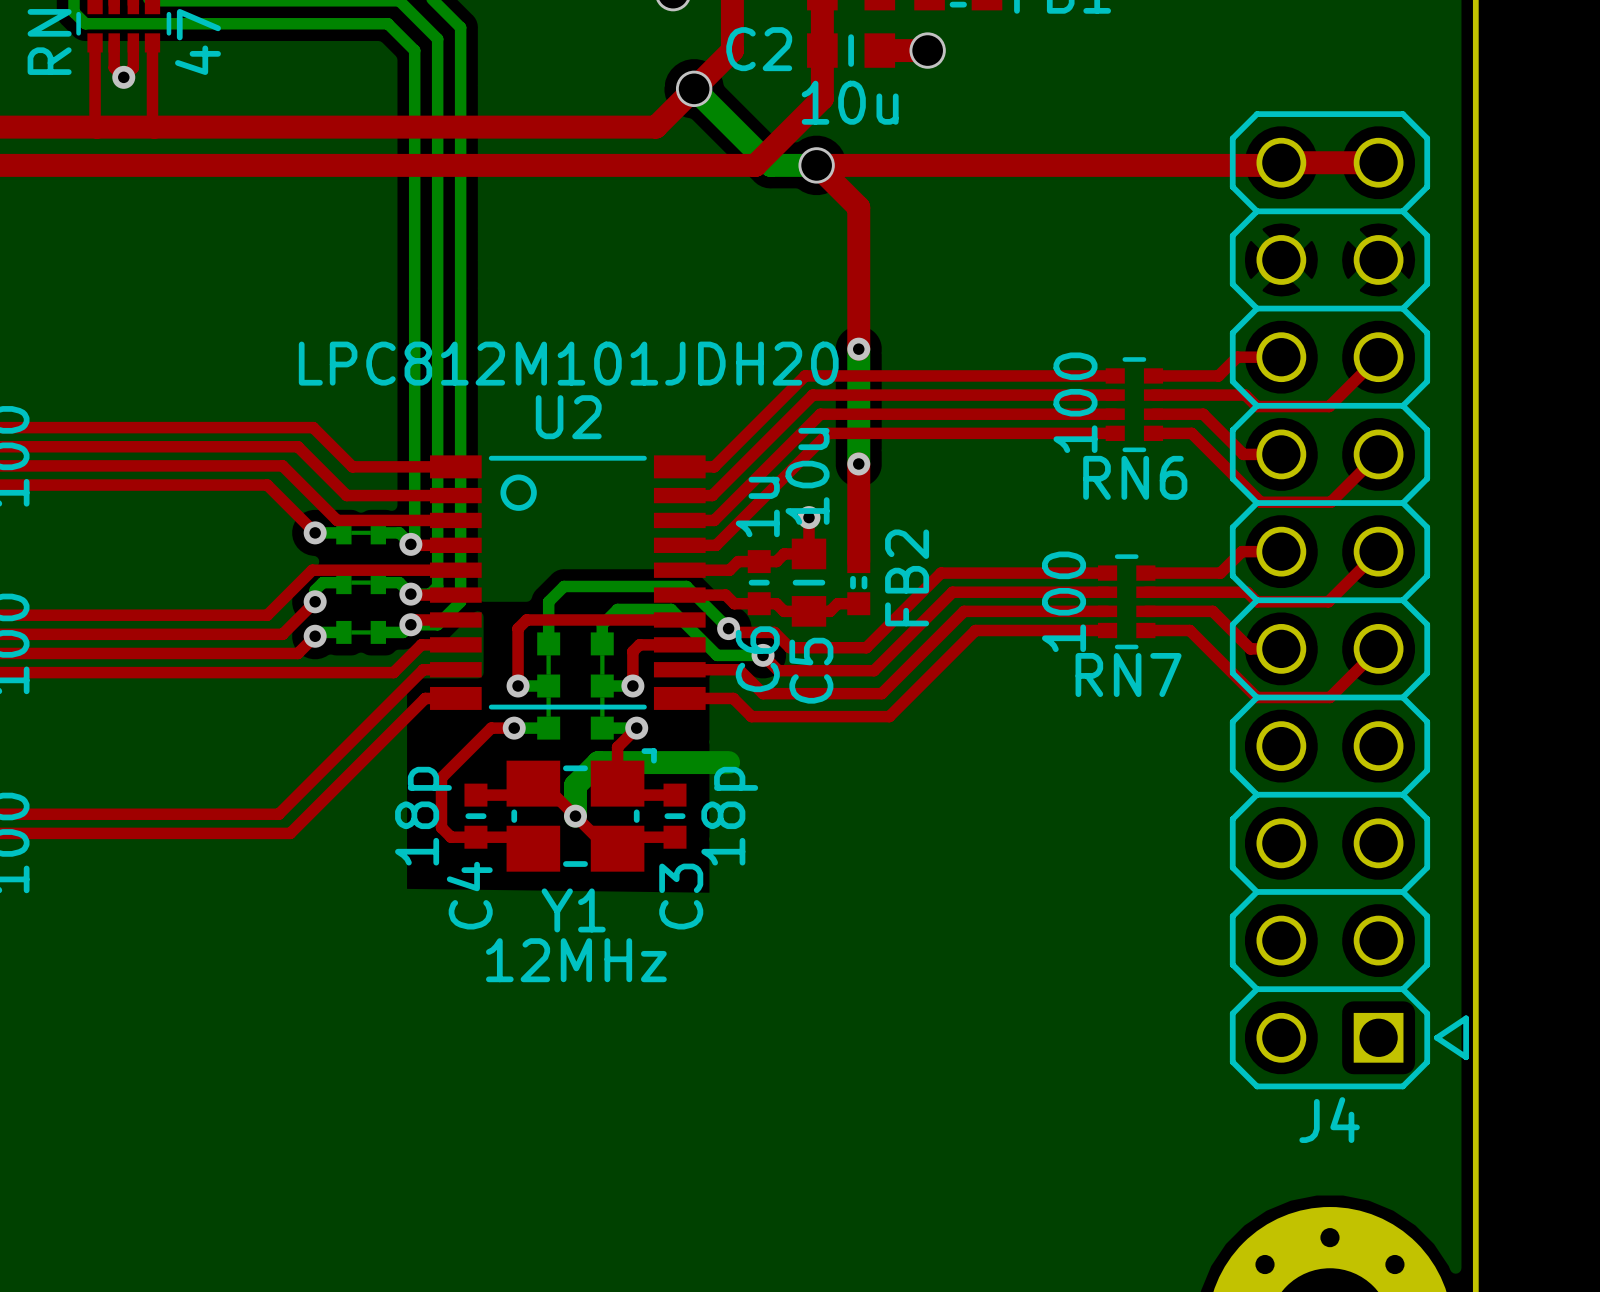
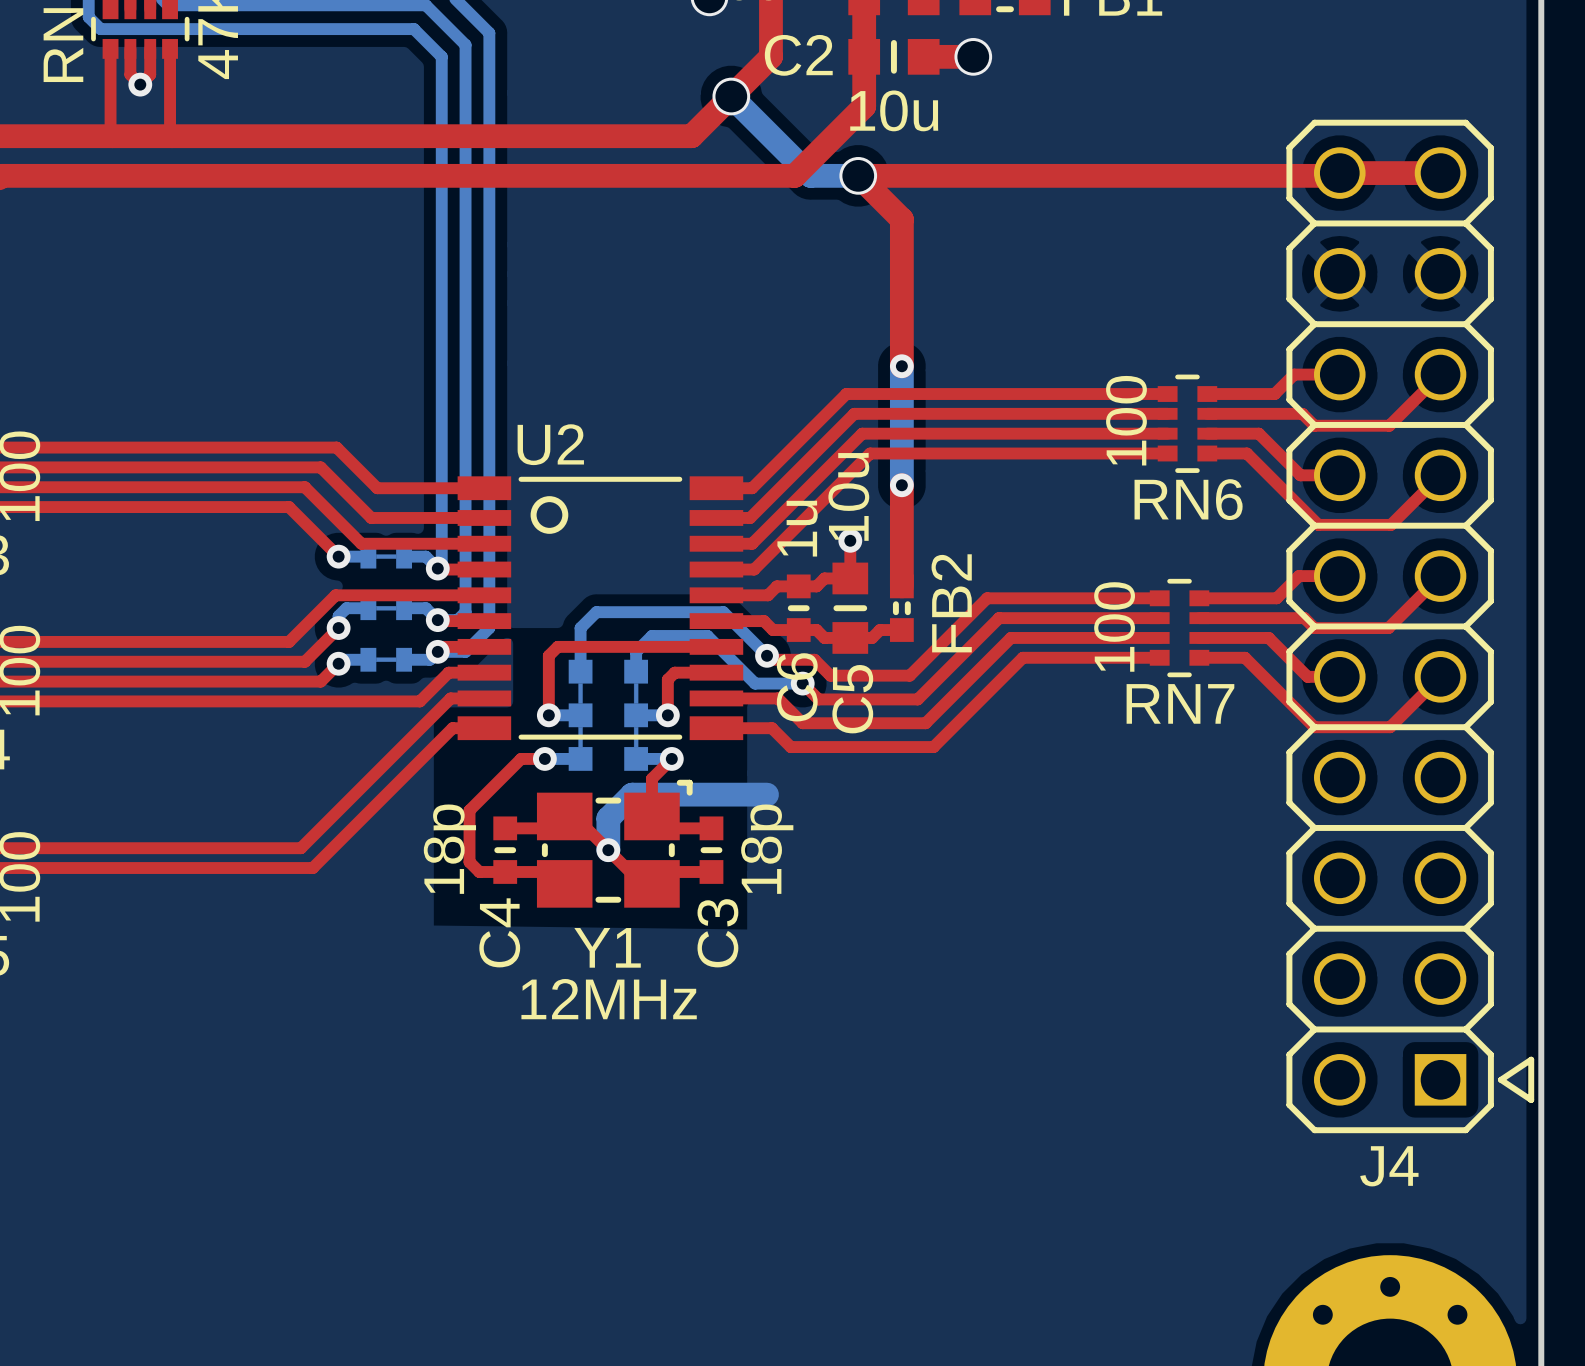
U2 value: LPC812M101JDH20 (568, 363) -> none
U2 name position: U2 (568, 417) -> U2 (550, 444)

